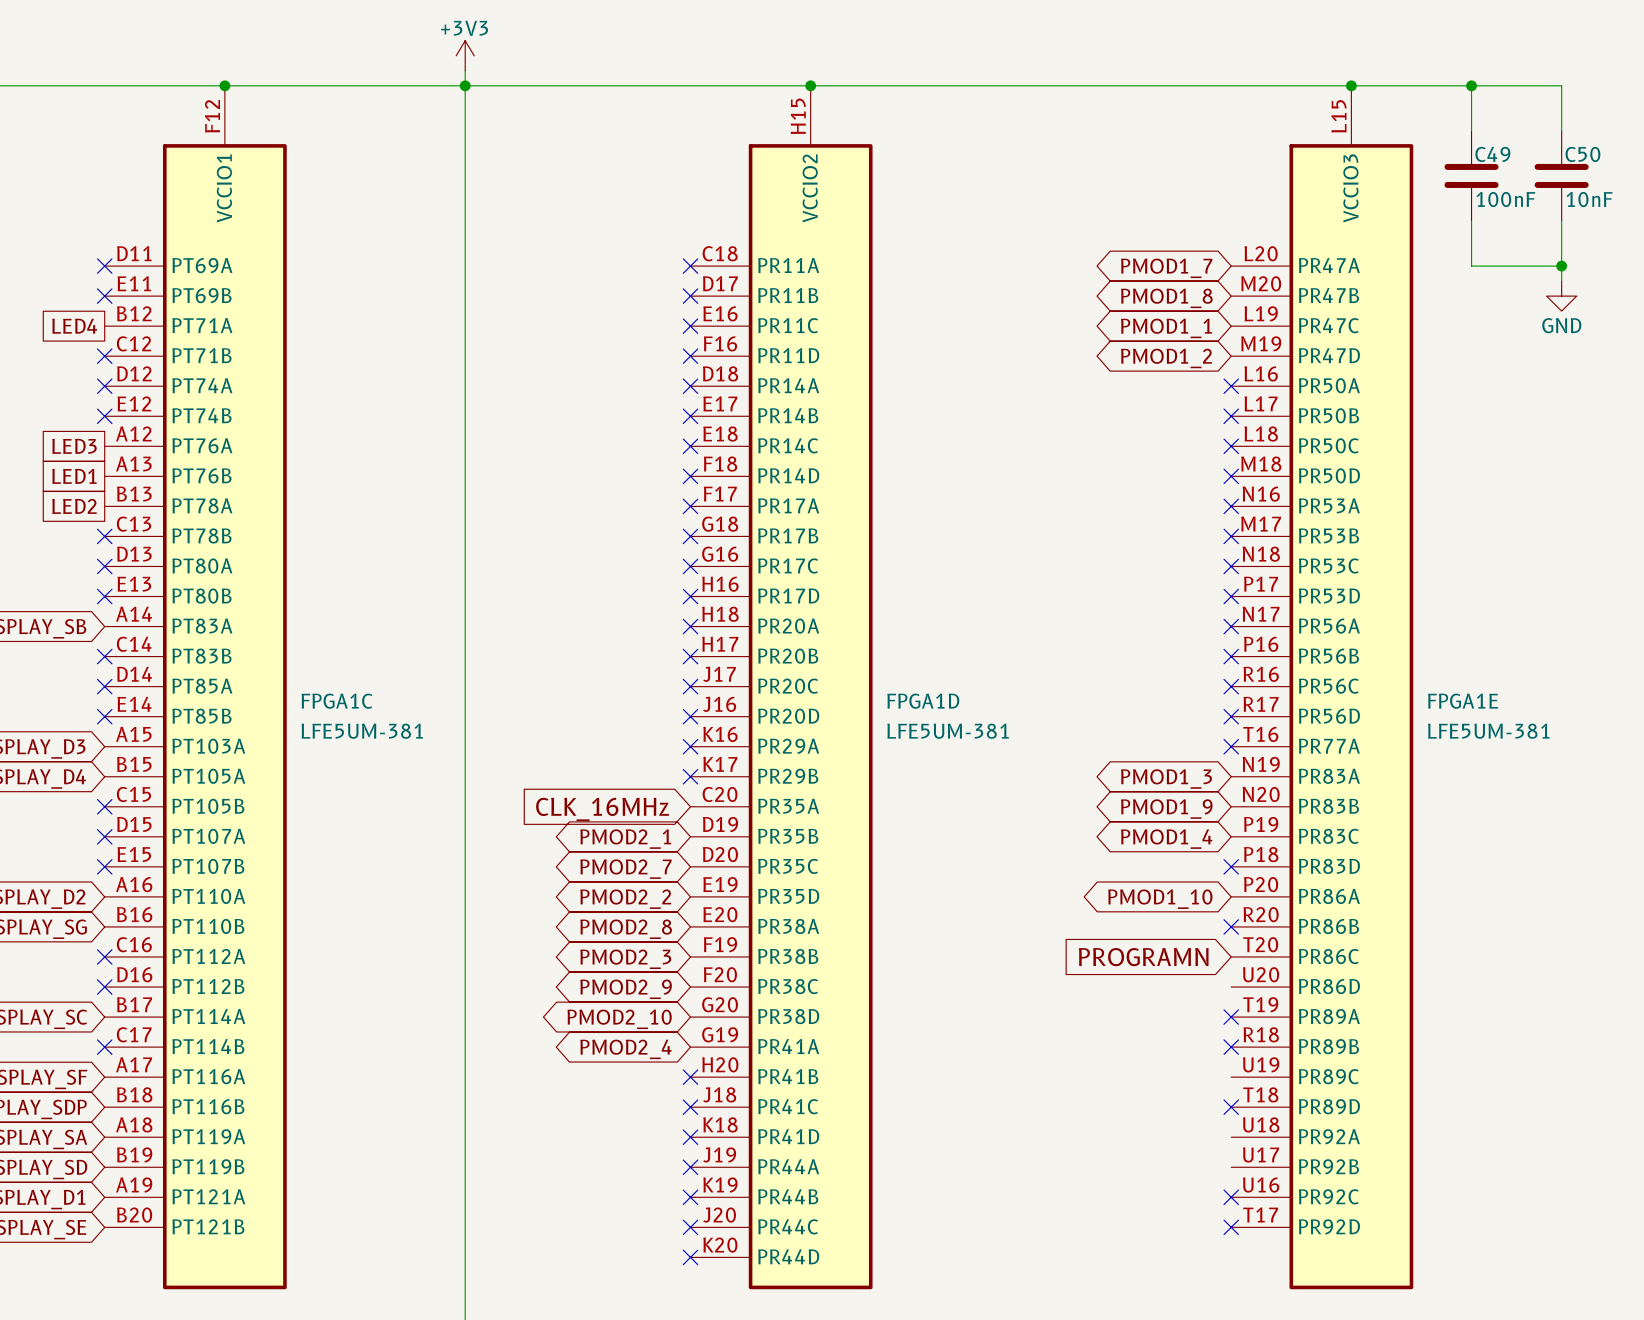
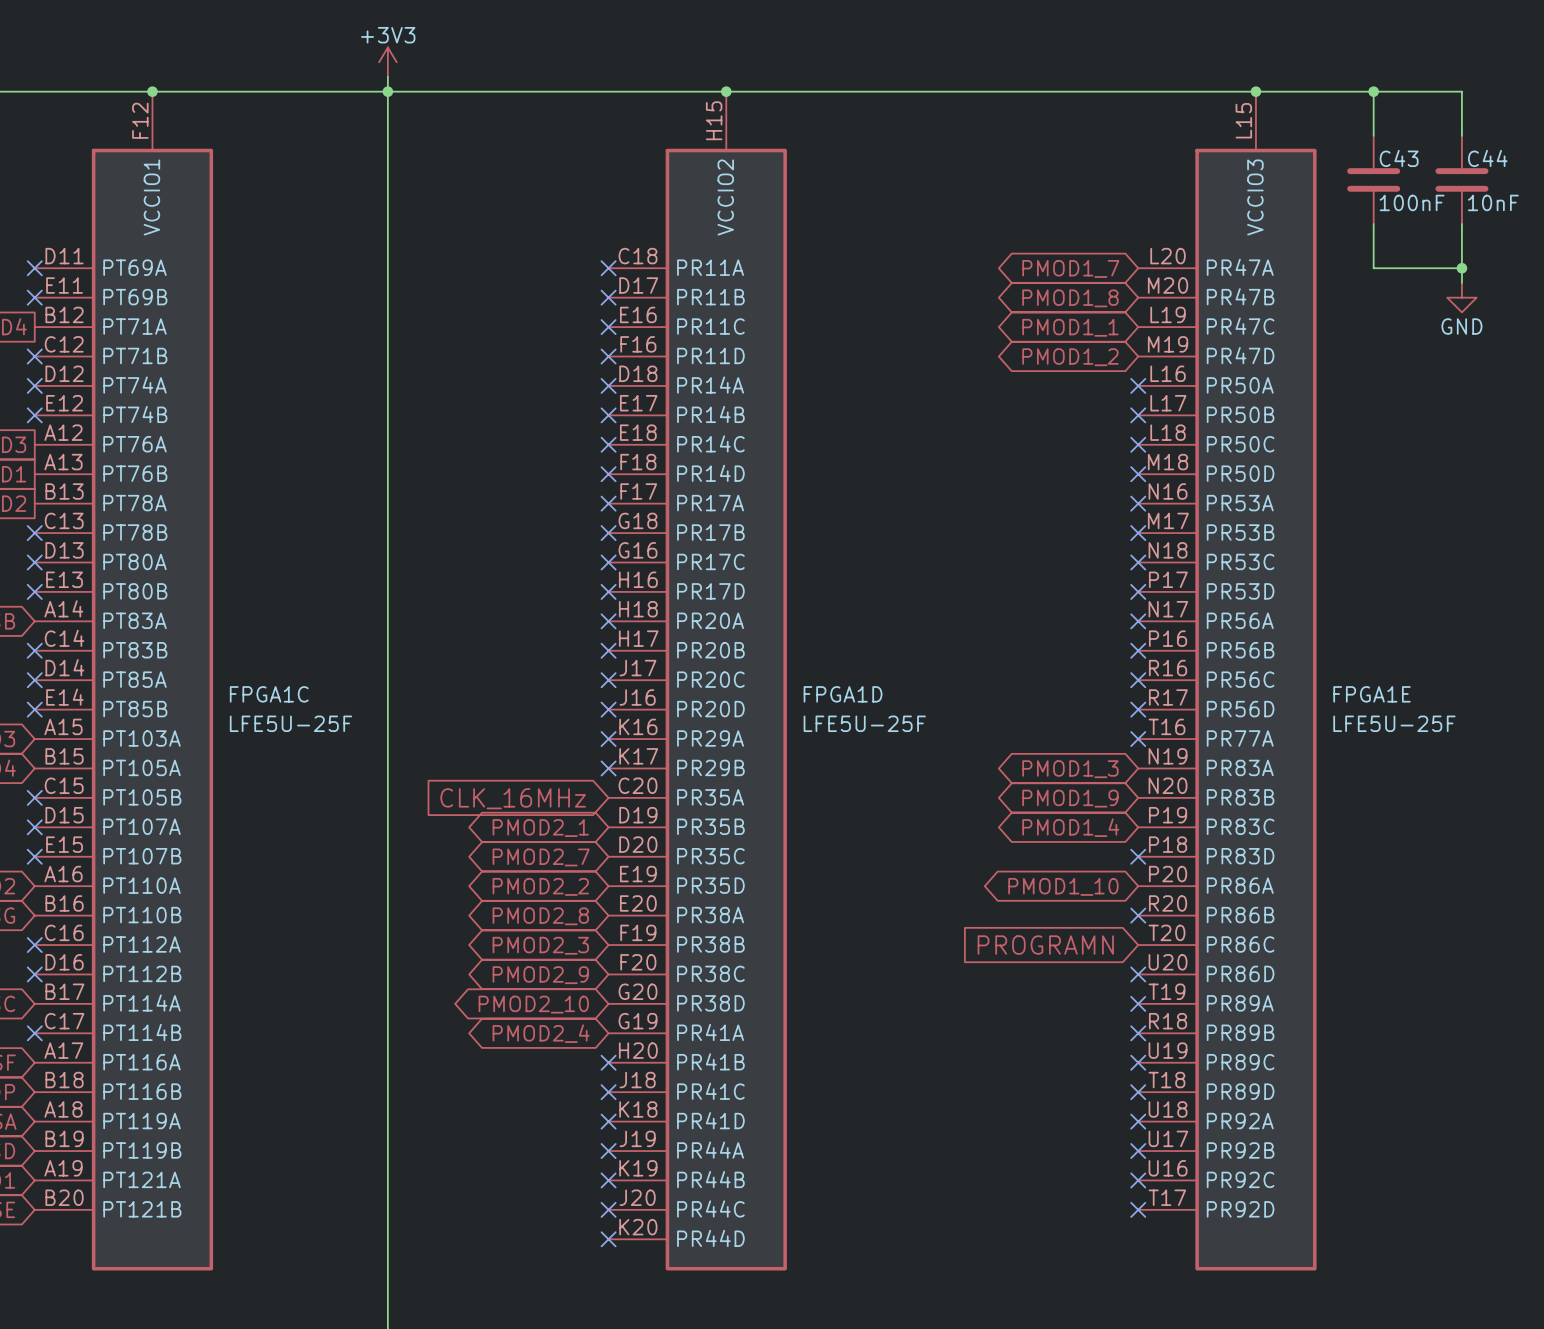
C49 name: C49 (1492, 154) -> C43 (1399, 158)
C50 name: C50 (1582, 154) -> C44 (1487, 158)
FPGA1C value: LFE5UM-381 (362, 731) -> LFE5U-25F (290, 723)
FPGA1D value: LFE5UM-381 (948, 731) -> LFE5U-25F (864, 723)
FPGA1E value: LFE5UM-381 (1488, 731) -> LFE5U-25F (1394, 723)
no-connect mark: none -> (1138, 974)
no-connect mark: none -> (1138, 1062)
no-connect mark: none -> (1138, 1121)
no-connect mark: none -> (1138, 1151)

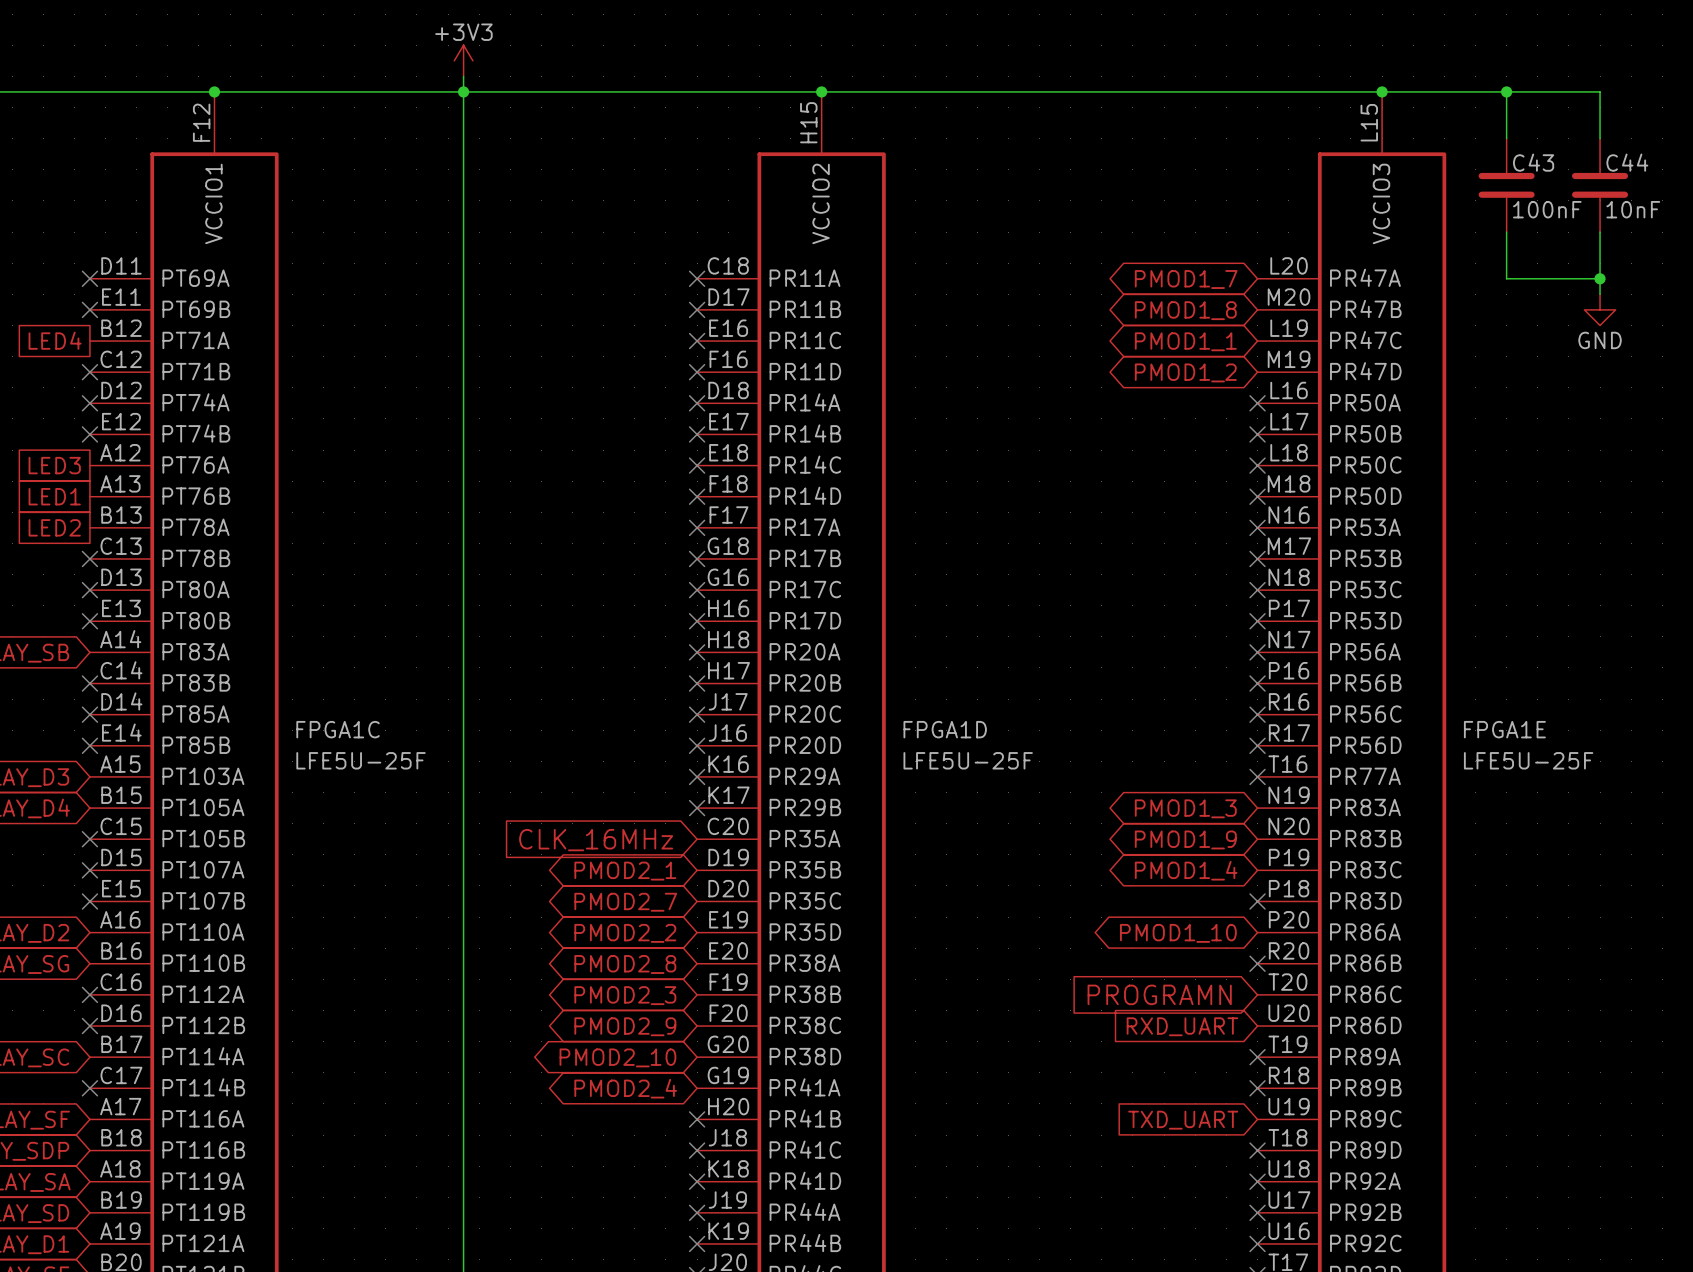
no-connect mark: (1138, 974) -> none
global label: none -> RXD_UART (1182, 1026)
no-connect mark: (1138, 1062) -> none
global label: none -> TXD_UART (1183, 1120)

